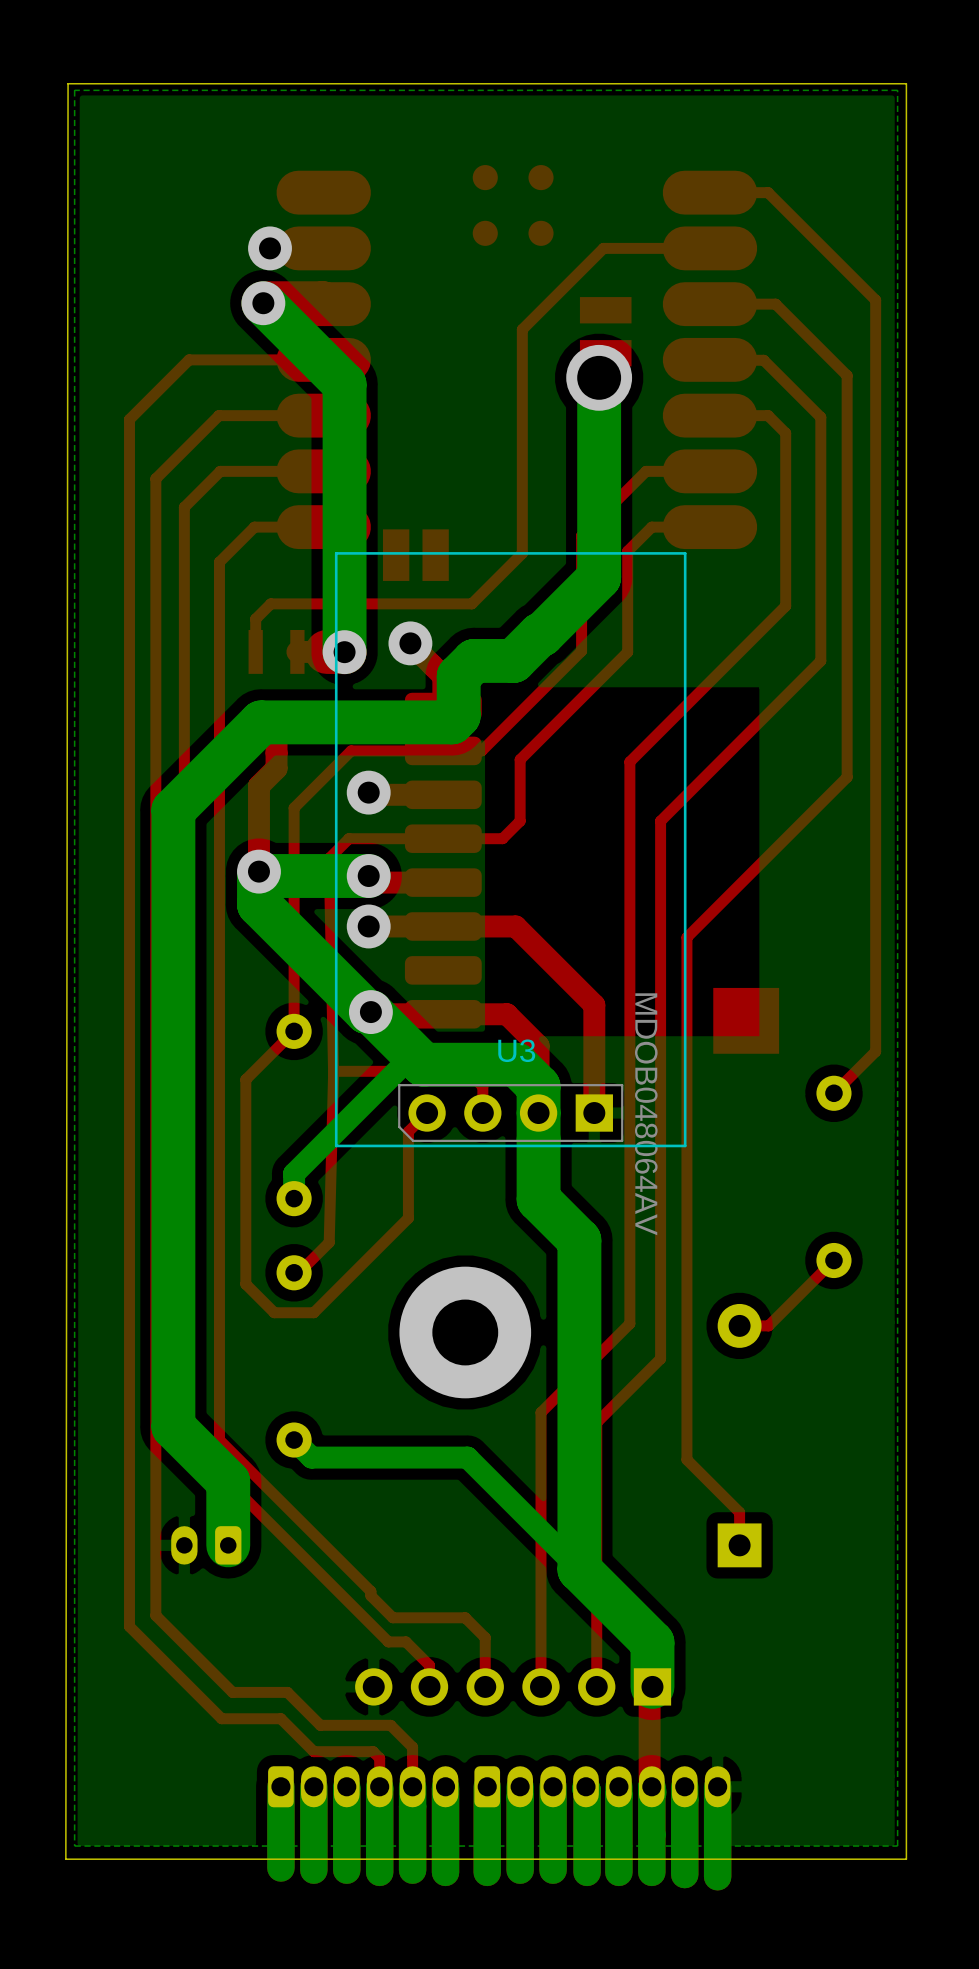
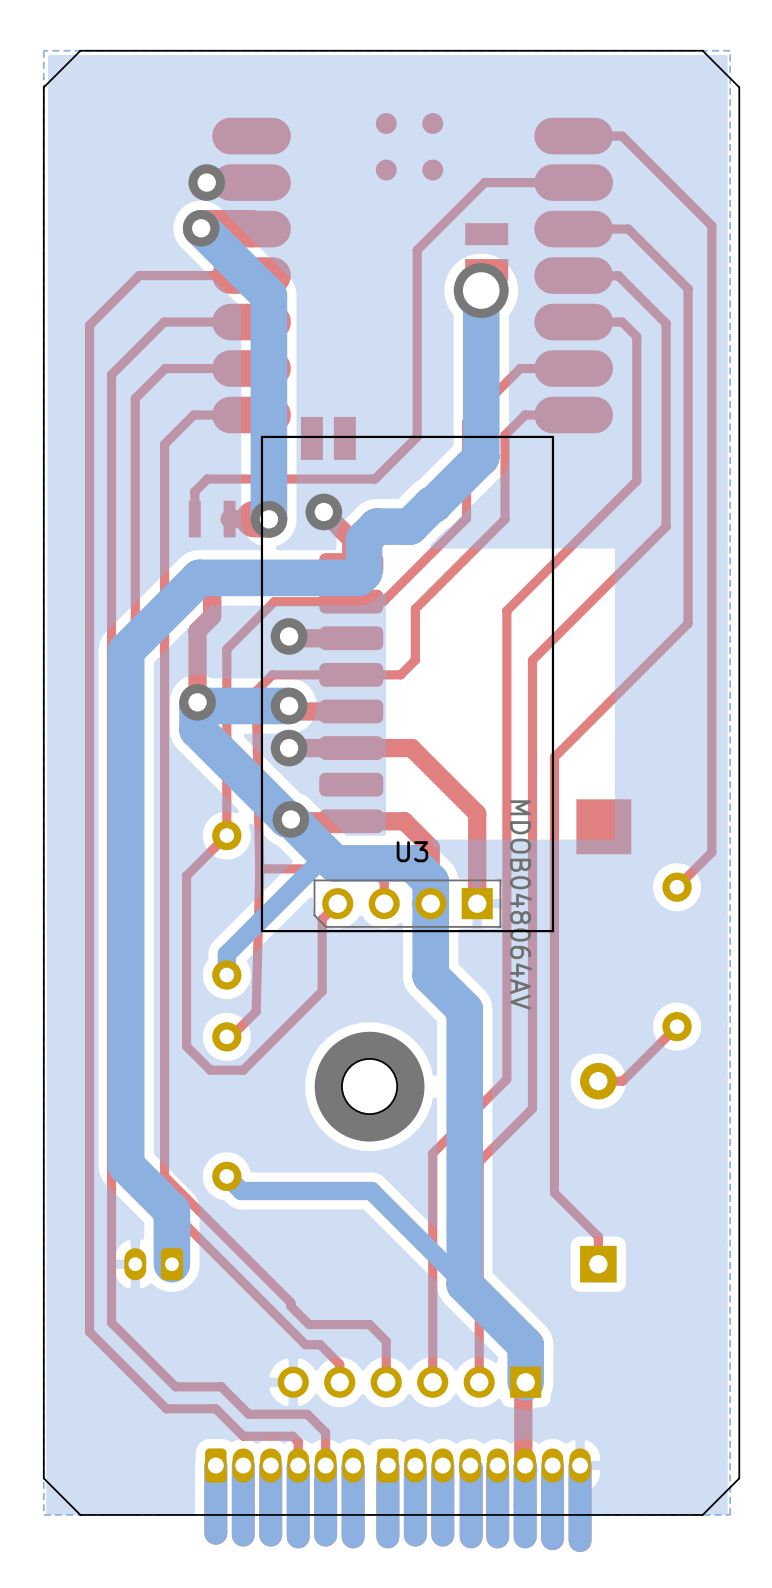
board edge: (906, 83) (906, 1859) (65, 1859) (68, 83) (906, 83) -> (702, 50) (739, 87) (739, 1478) (702, 1514) (80, 1514) (43, 1478) (43, 87) (80, 50) (702, 50)
round board edge: none -> [341, 1058, 398, 1115]

